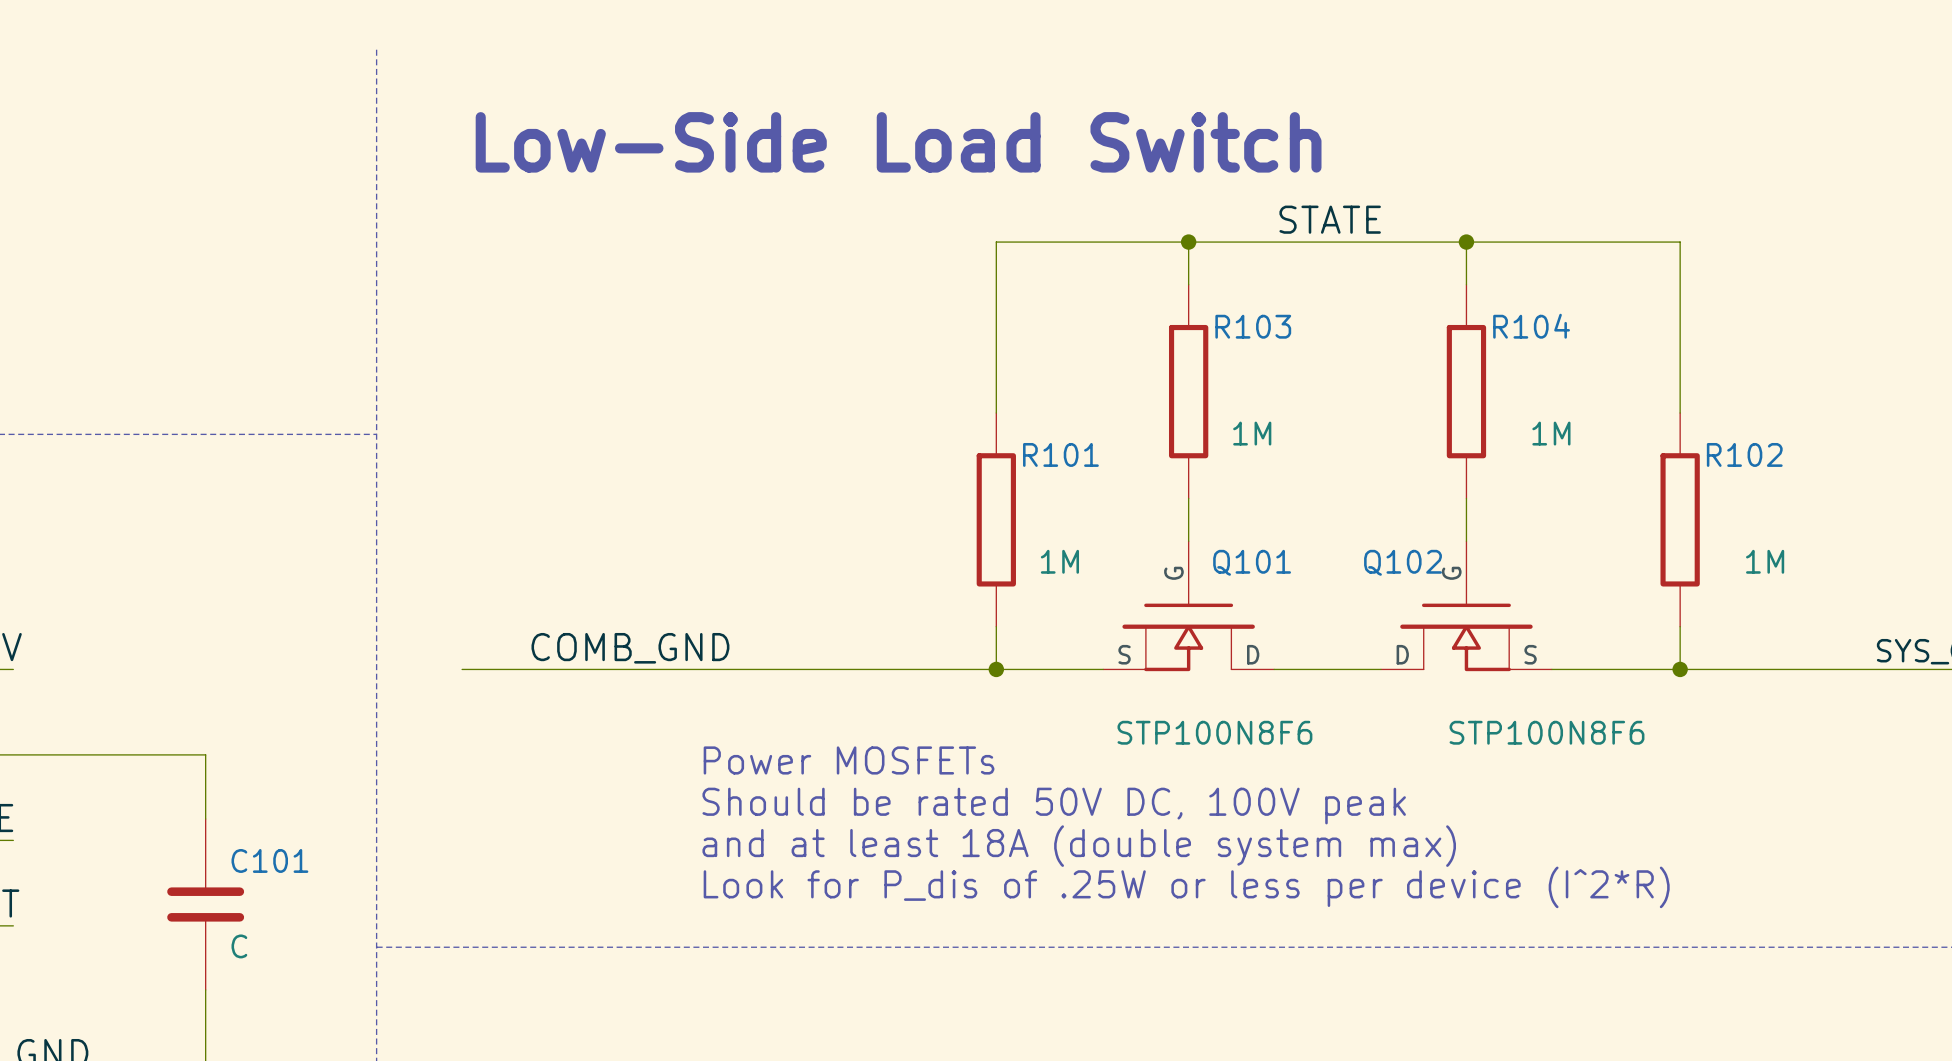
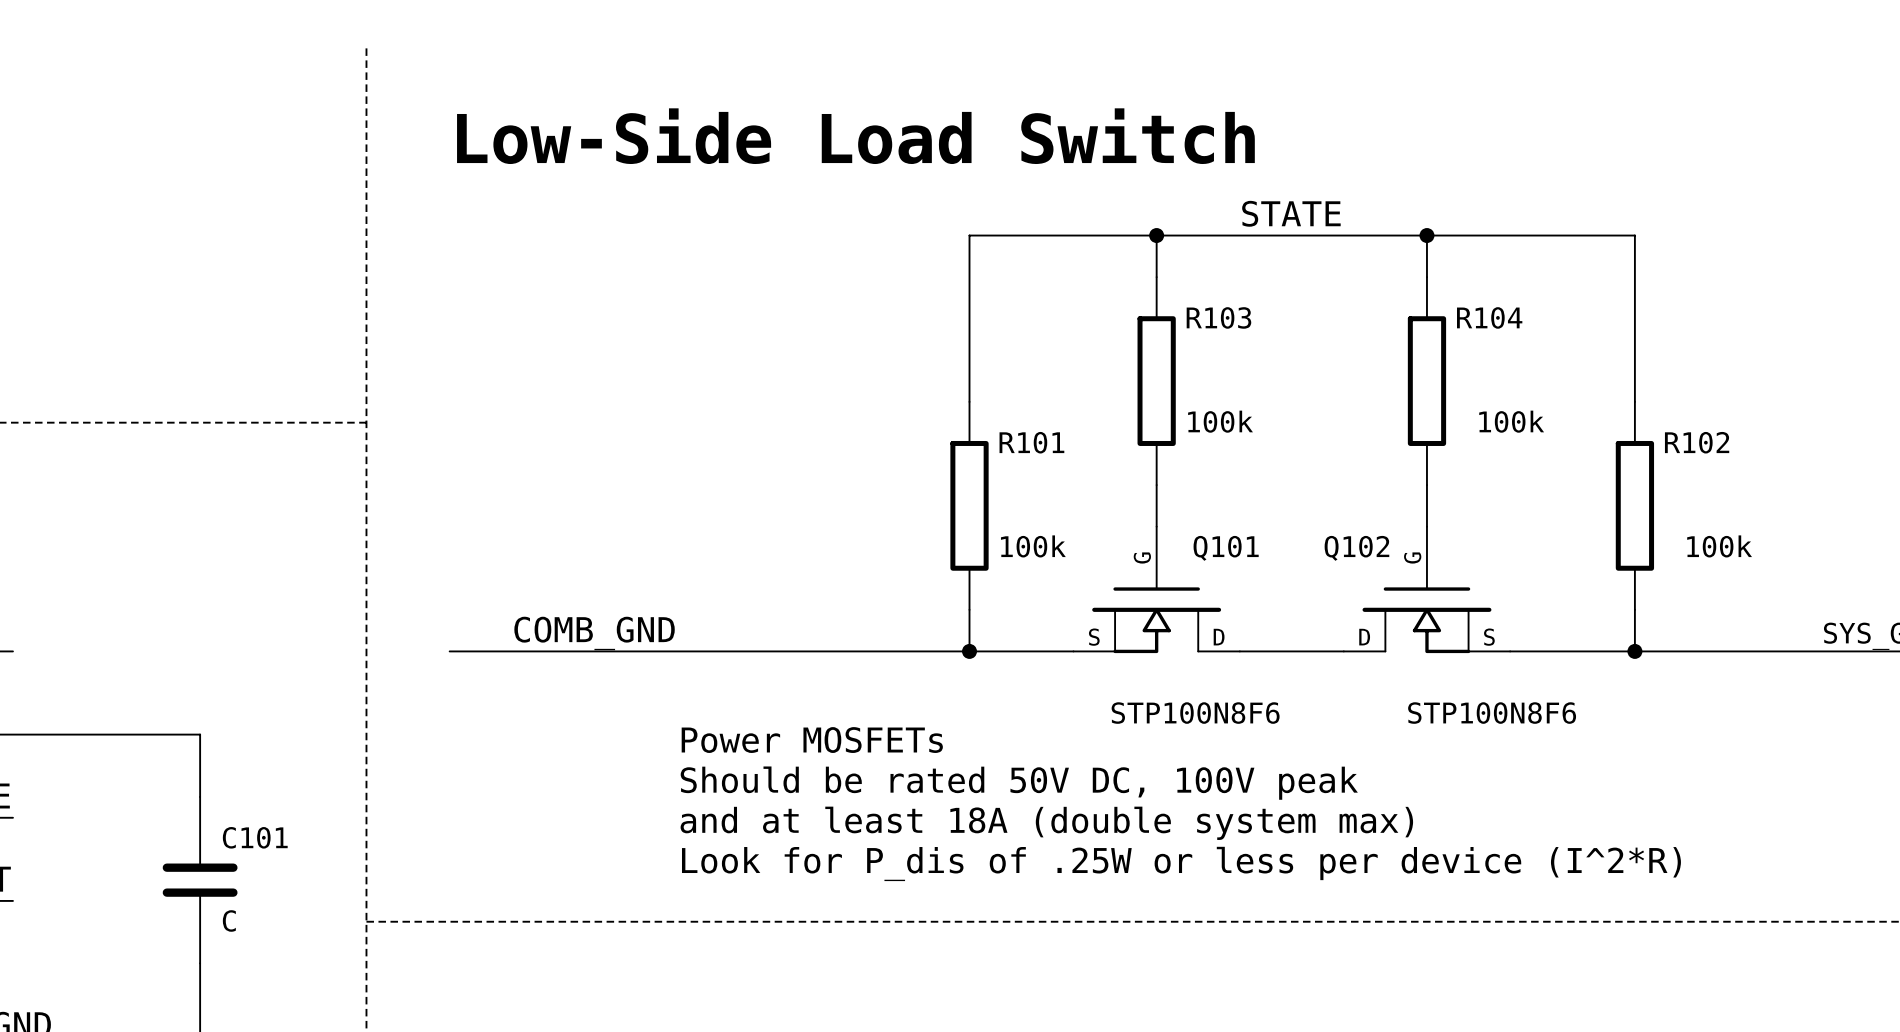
R103 value: 1M (1252, 433) -> 100k (1220, 421)
R104 value: 1M (1551, 433) -> 100k (1511, 421)
R101 value: 1M (1059, 561) -> 100k (1033, 546)
R102 value: 1M (1765, 561) -> 100k (1719, 546)

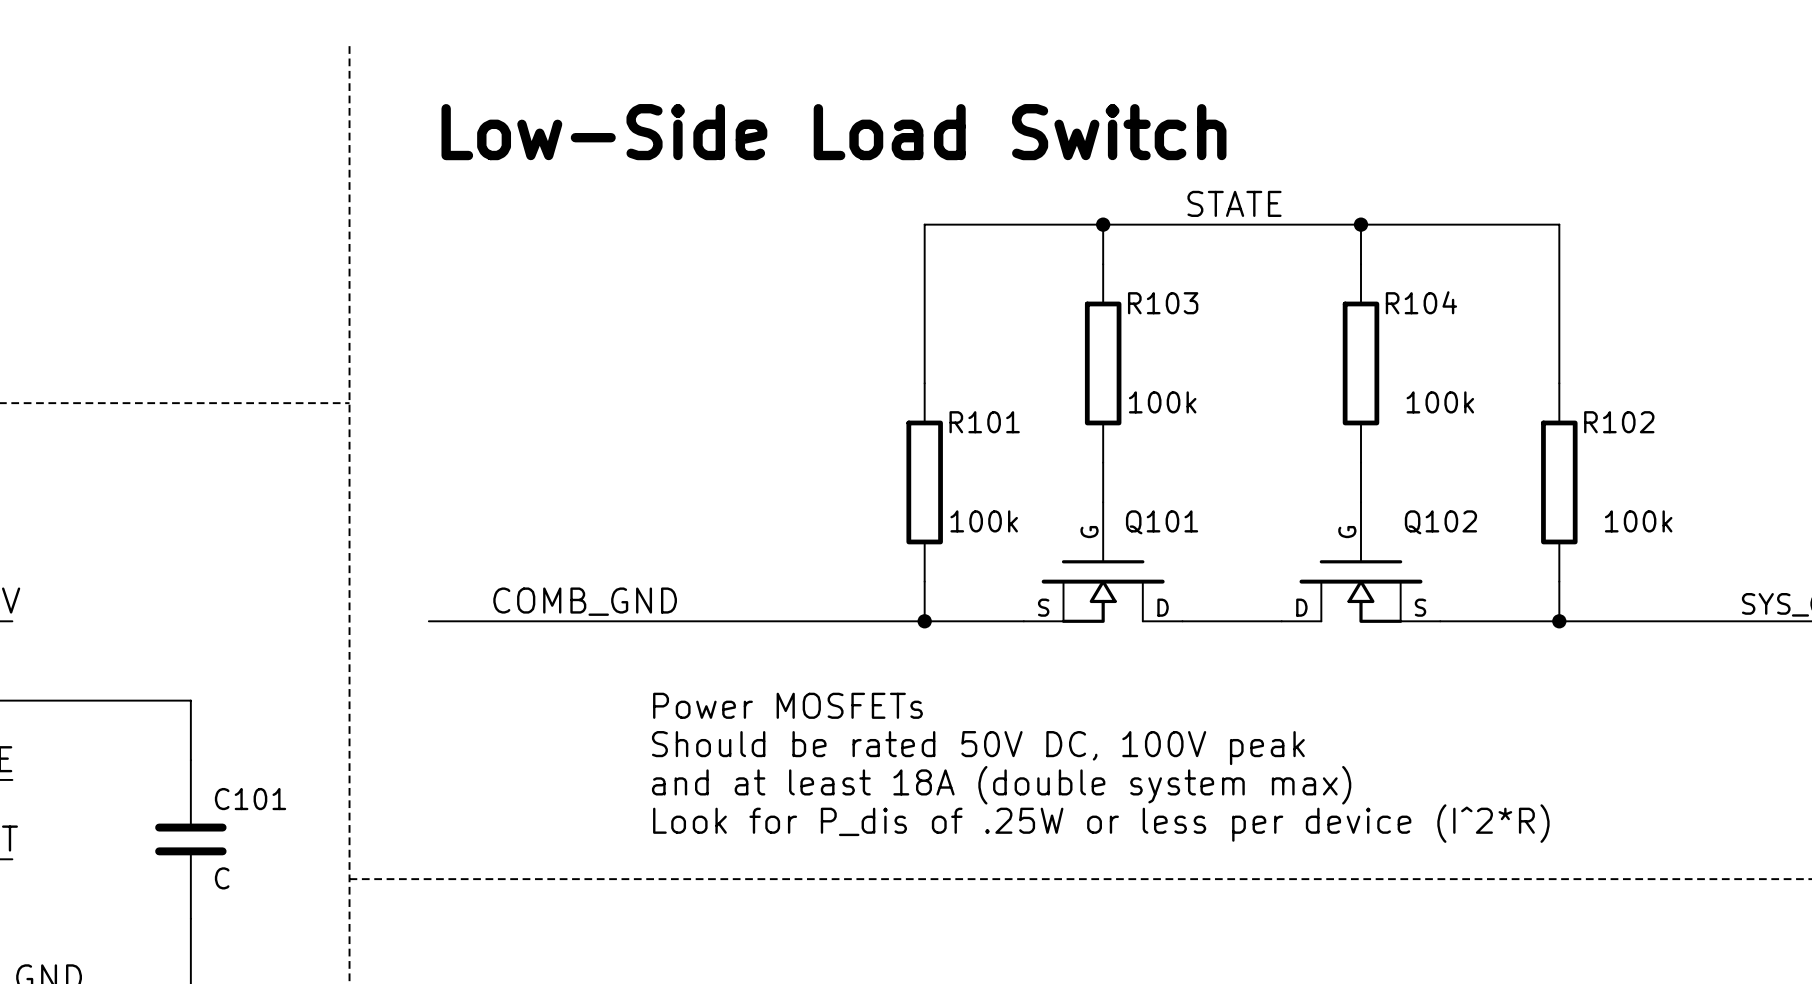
Q102 name position: Q102 (1356, 548) -> Q102 (1440, 522)
Q101 value: STP100N8F6 (1195, 713) -> none
Q102 value: STP100N8F6 (1492, 713) -> none

